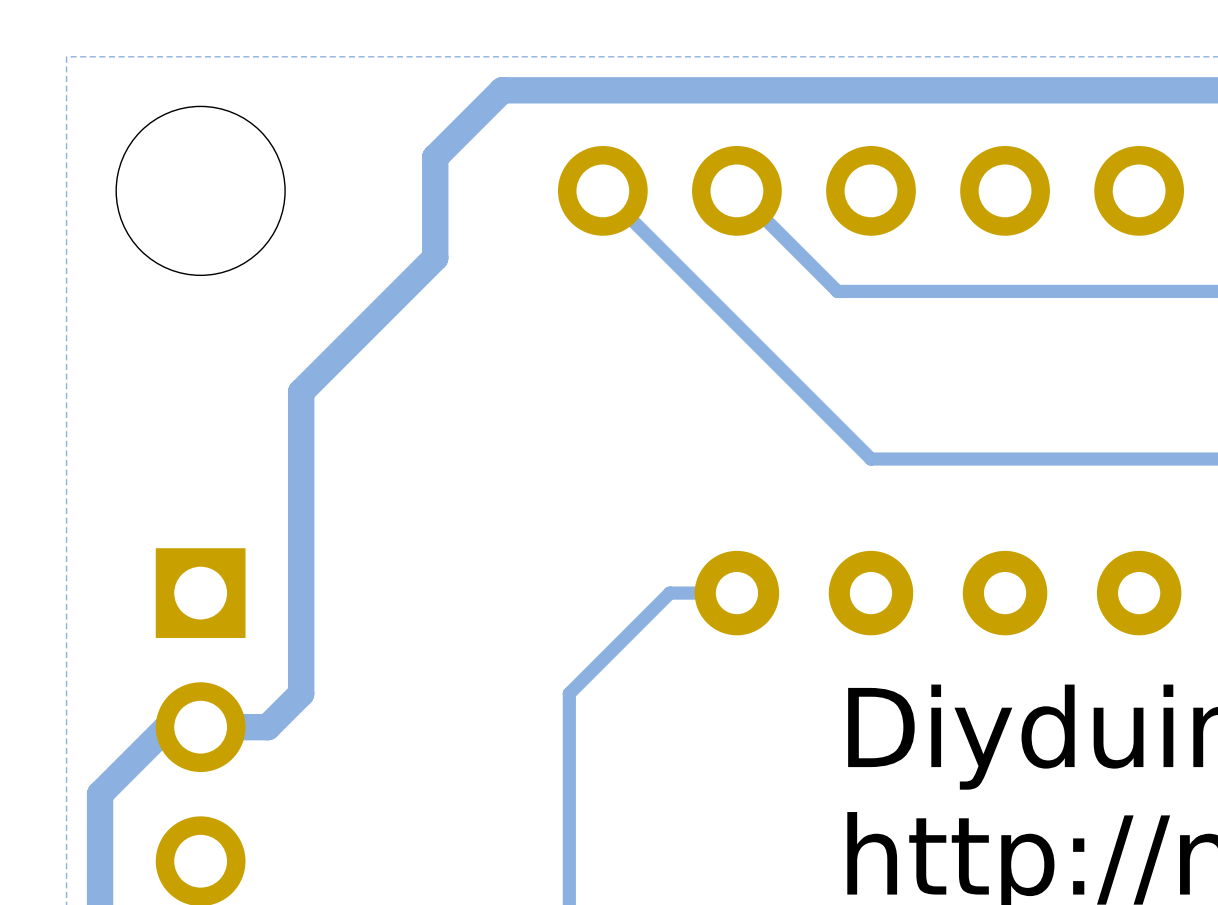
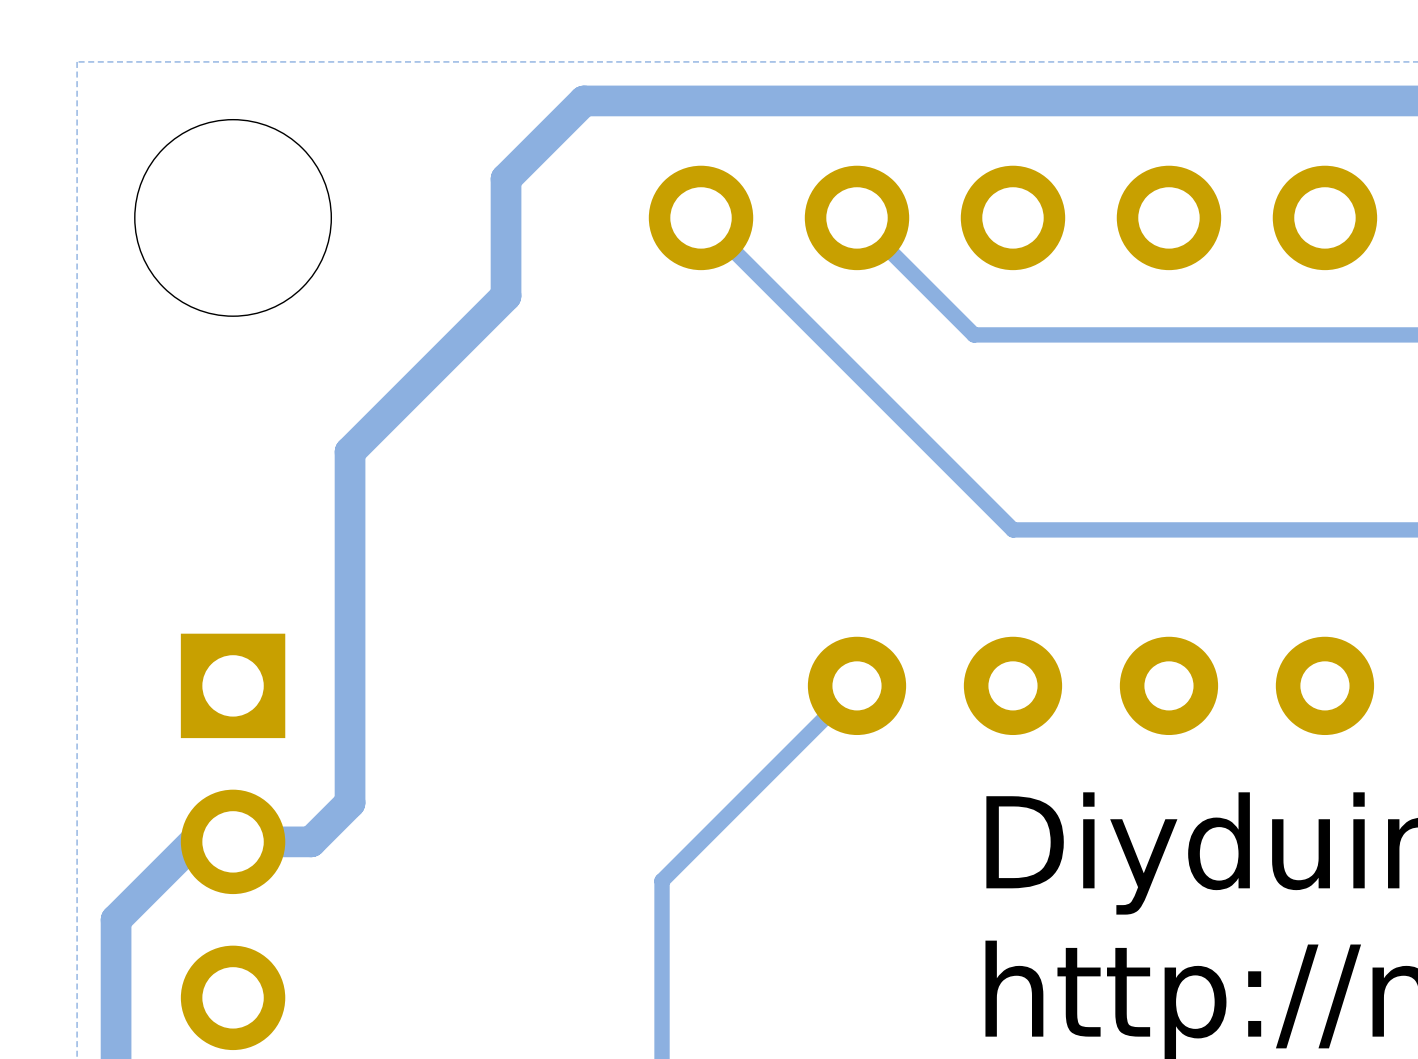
track: (736, 593) (669, 593) (569, 693) (569, 760) -> (857, 685) (662, 880)

